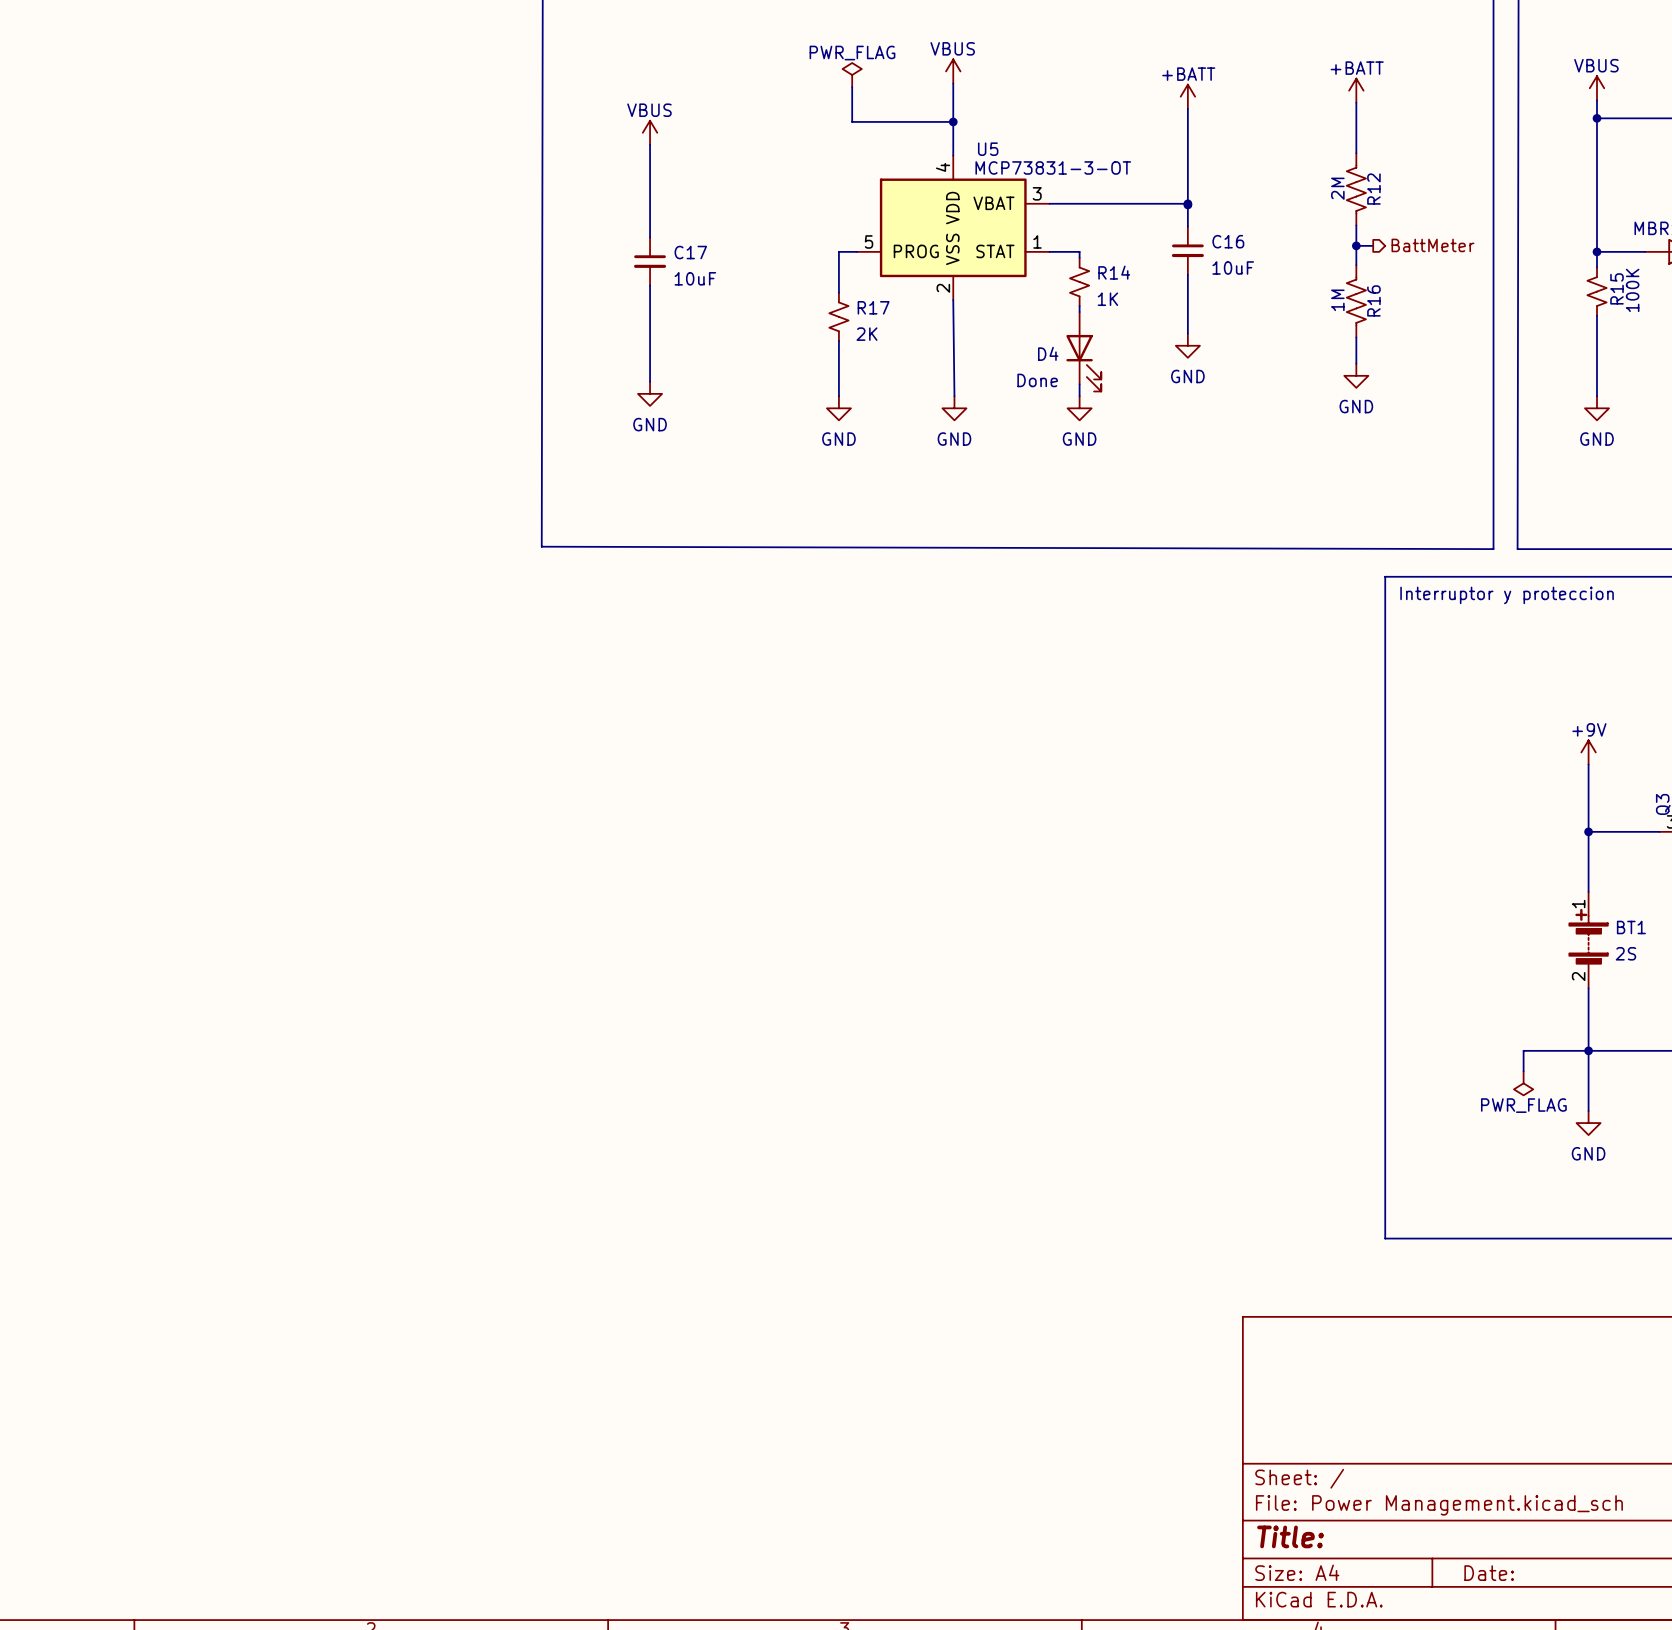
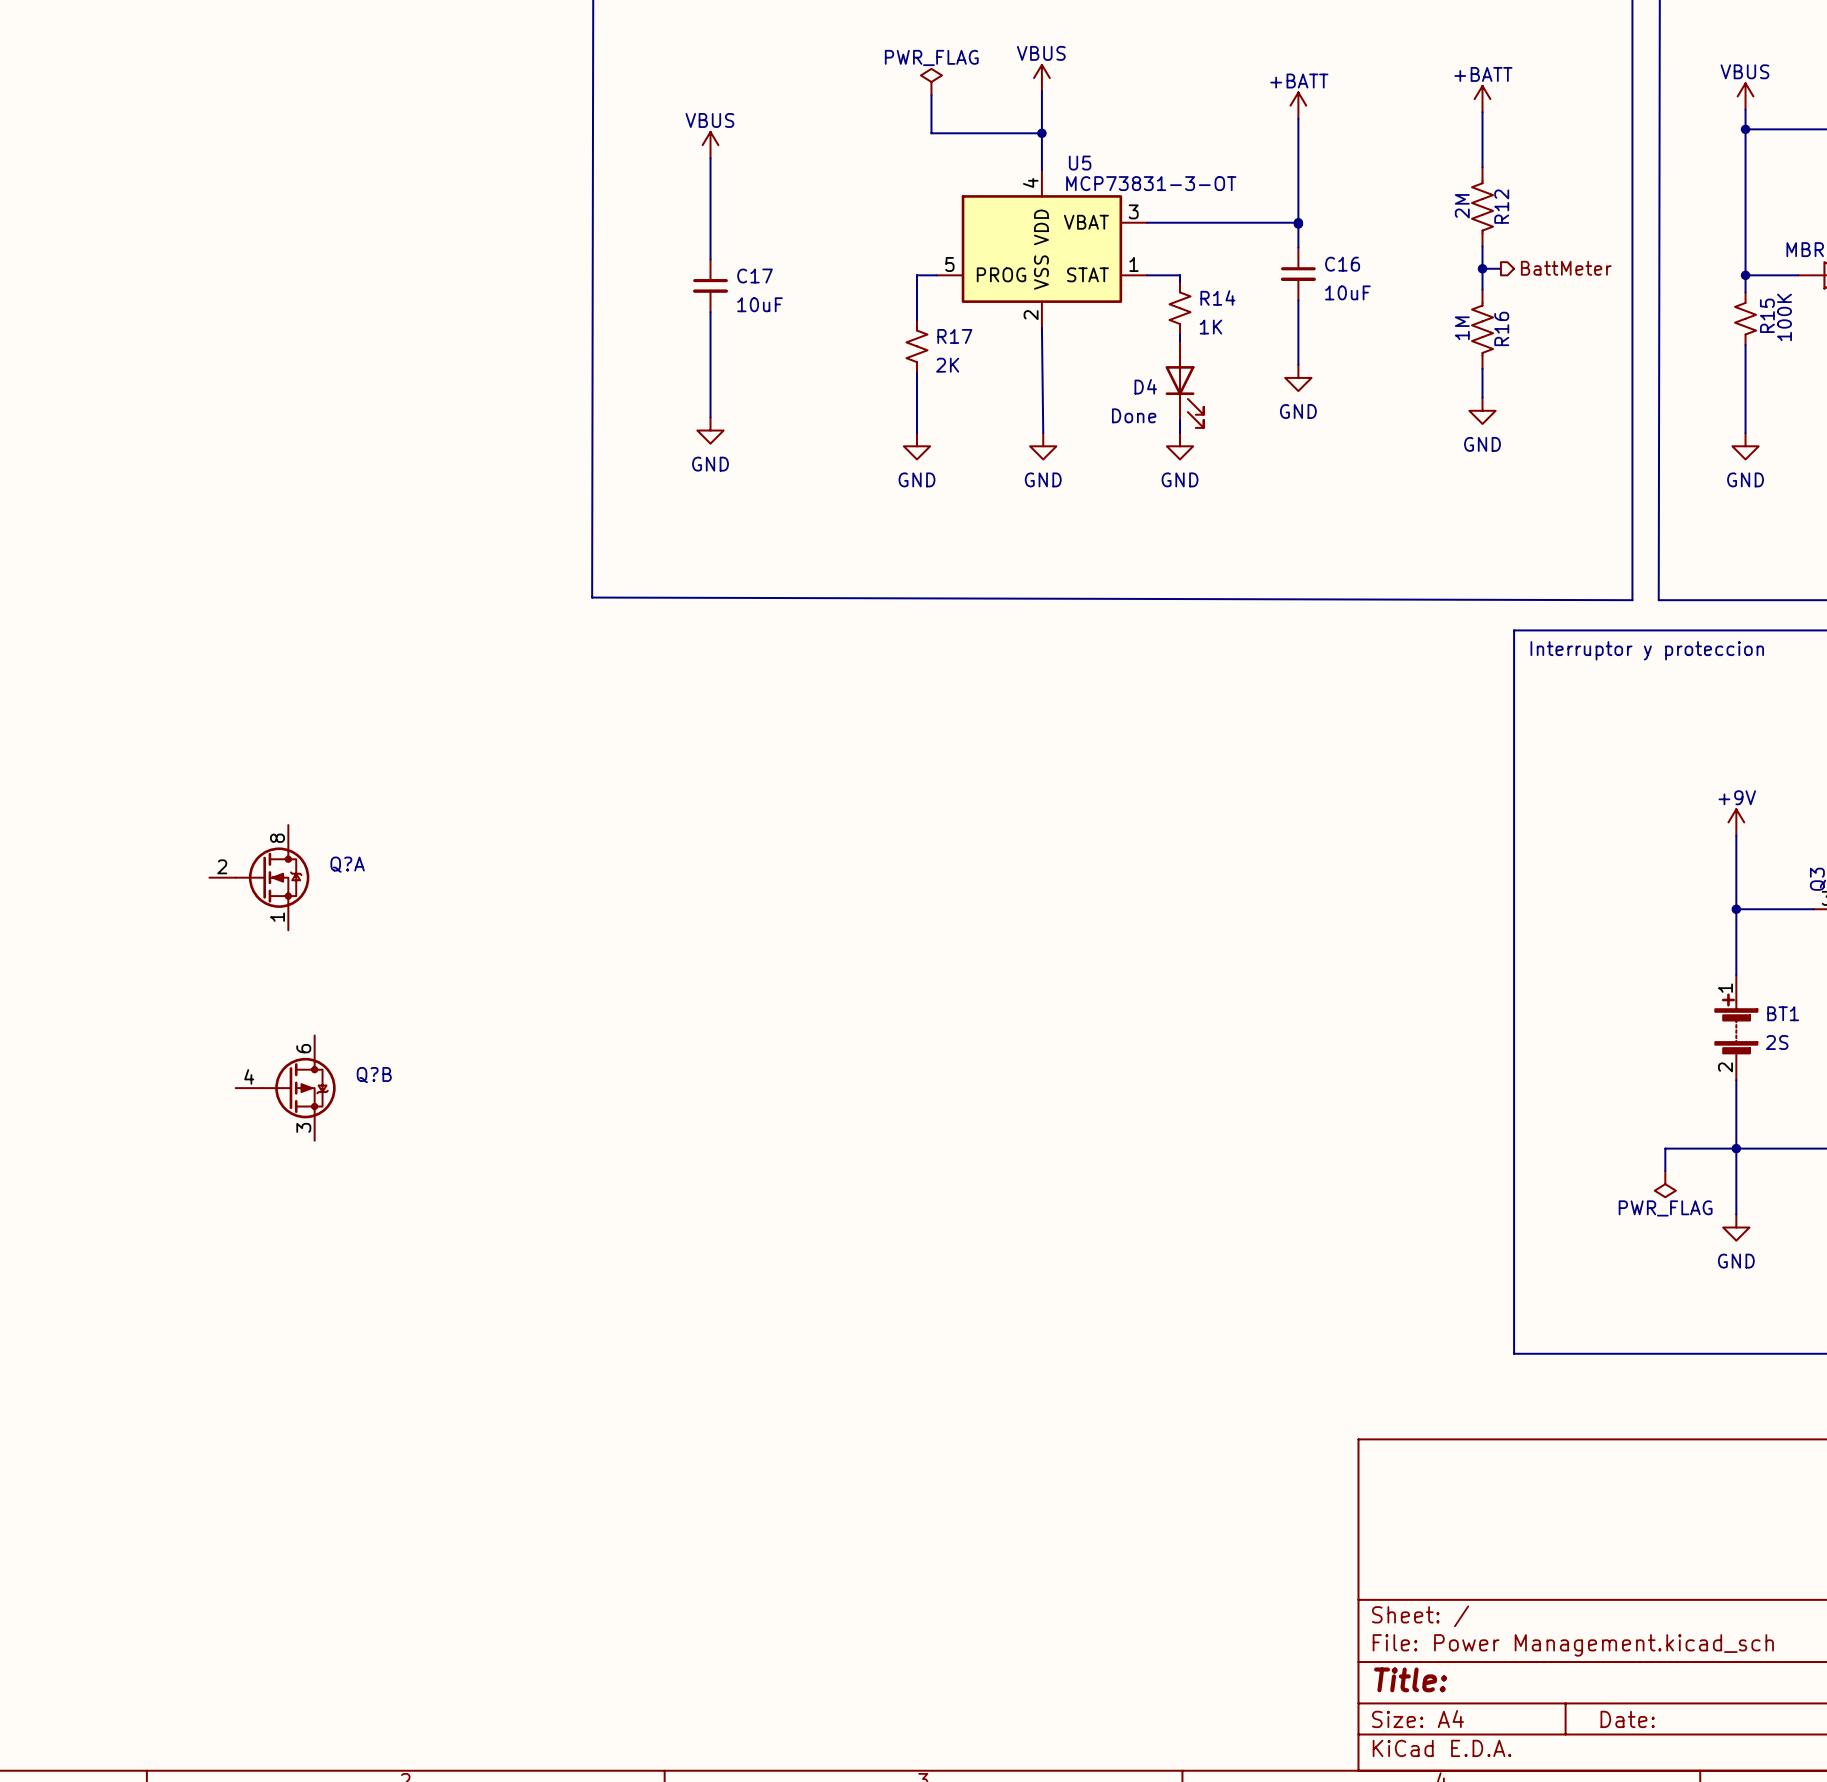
Q?A: none -> (259, 877)
Q?B: none -> (285, 1088)

